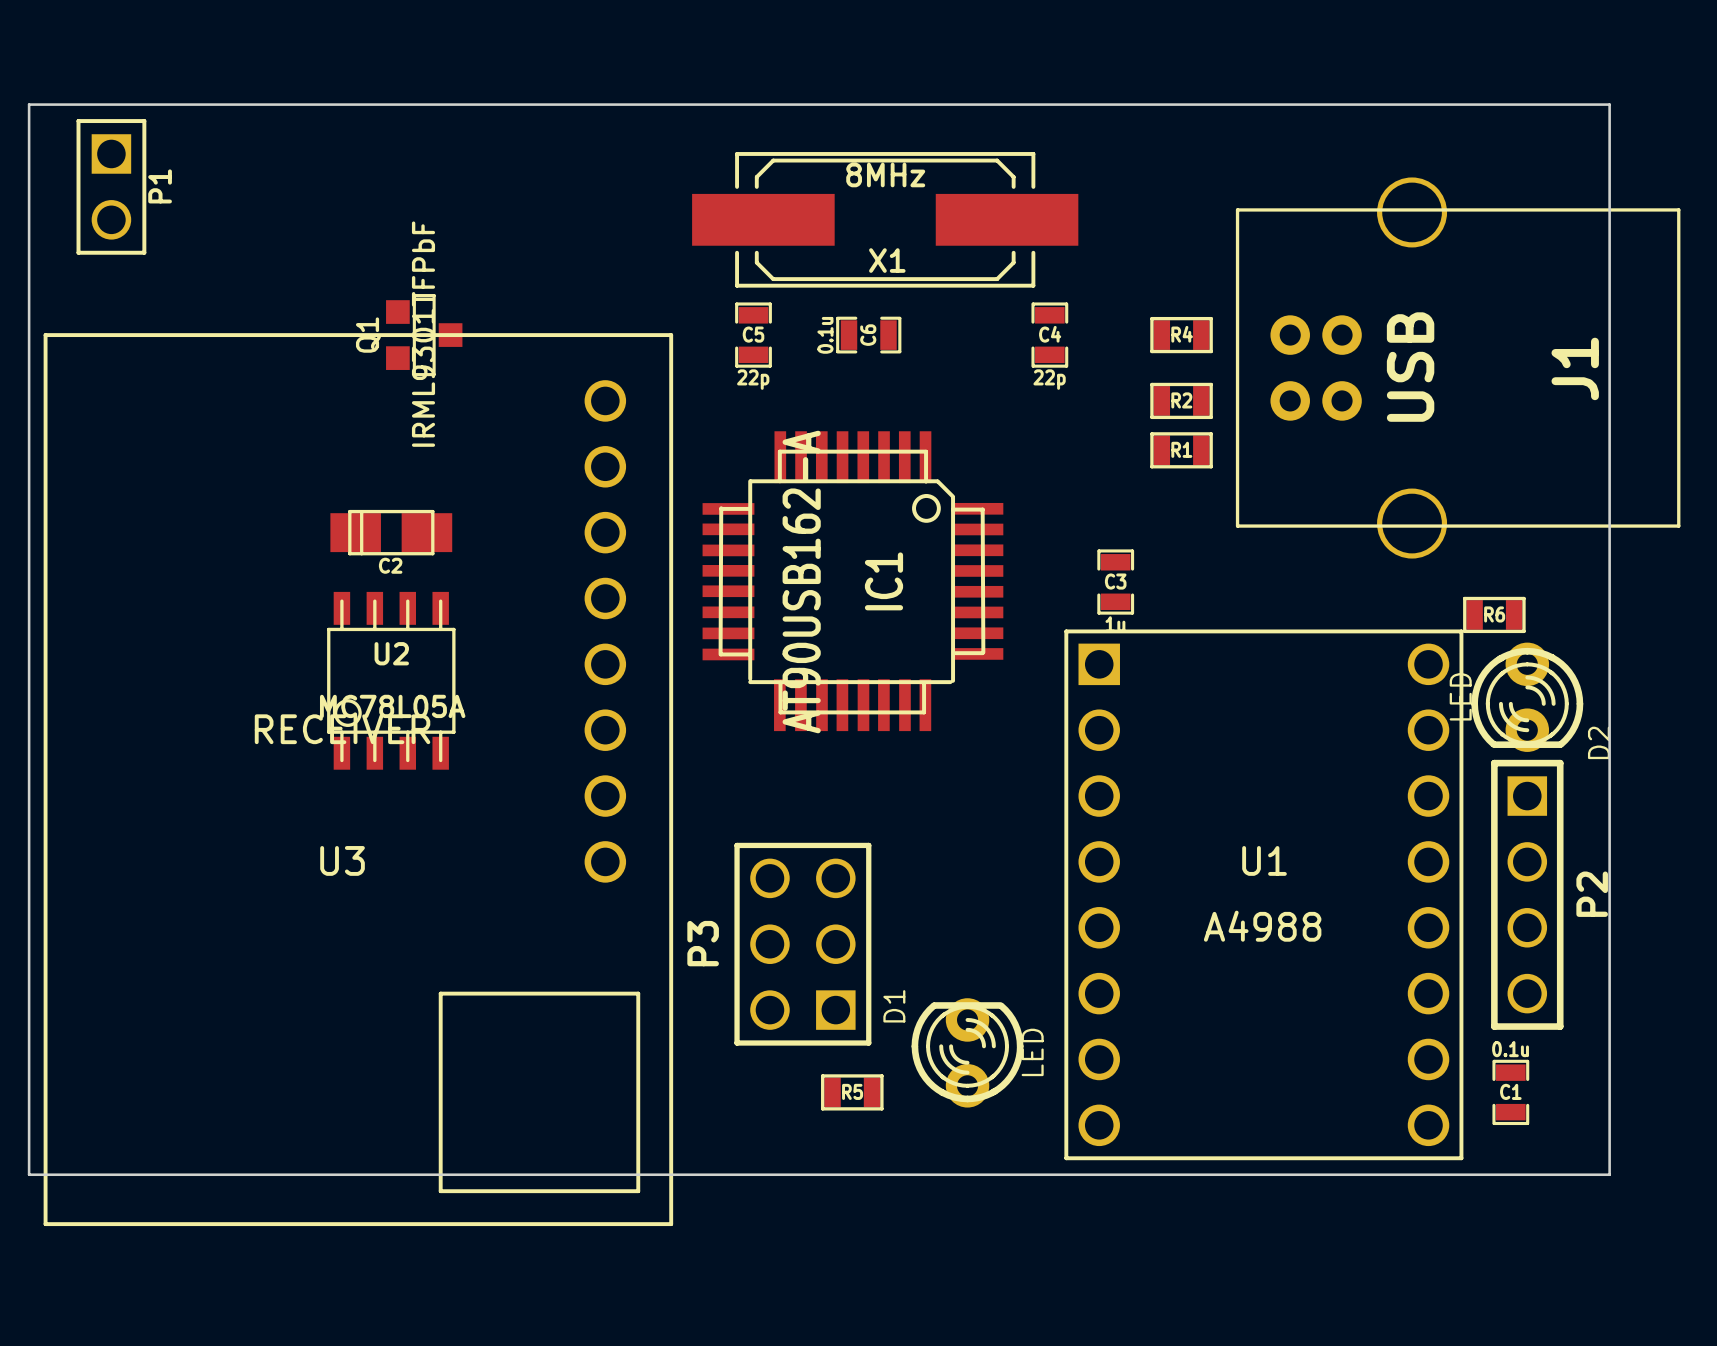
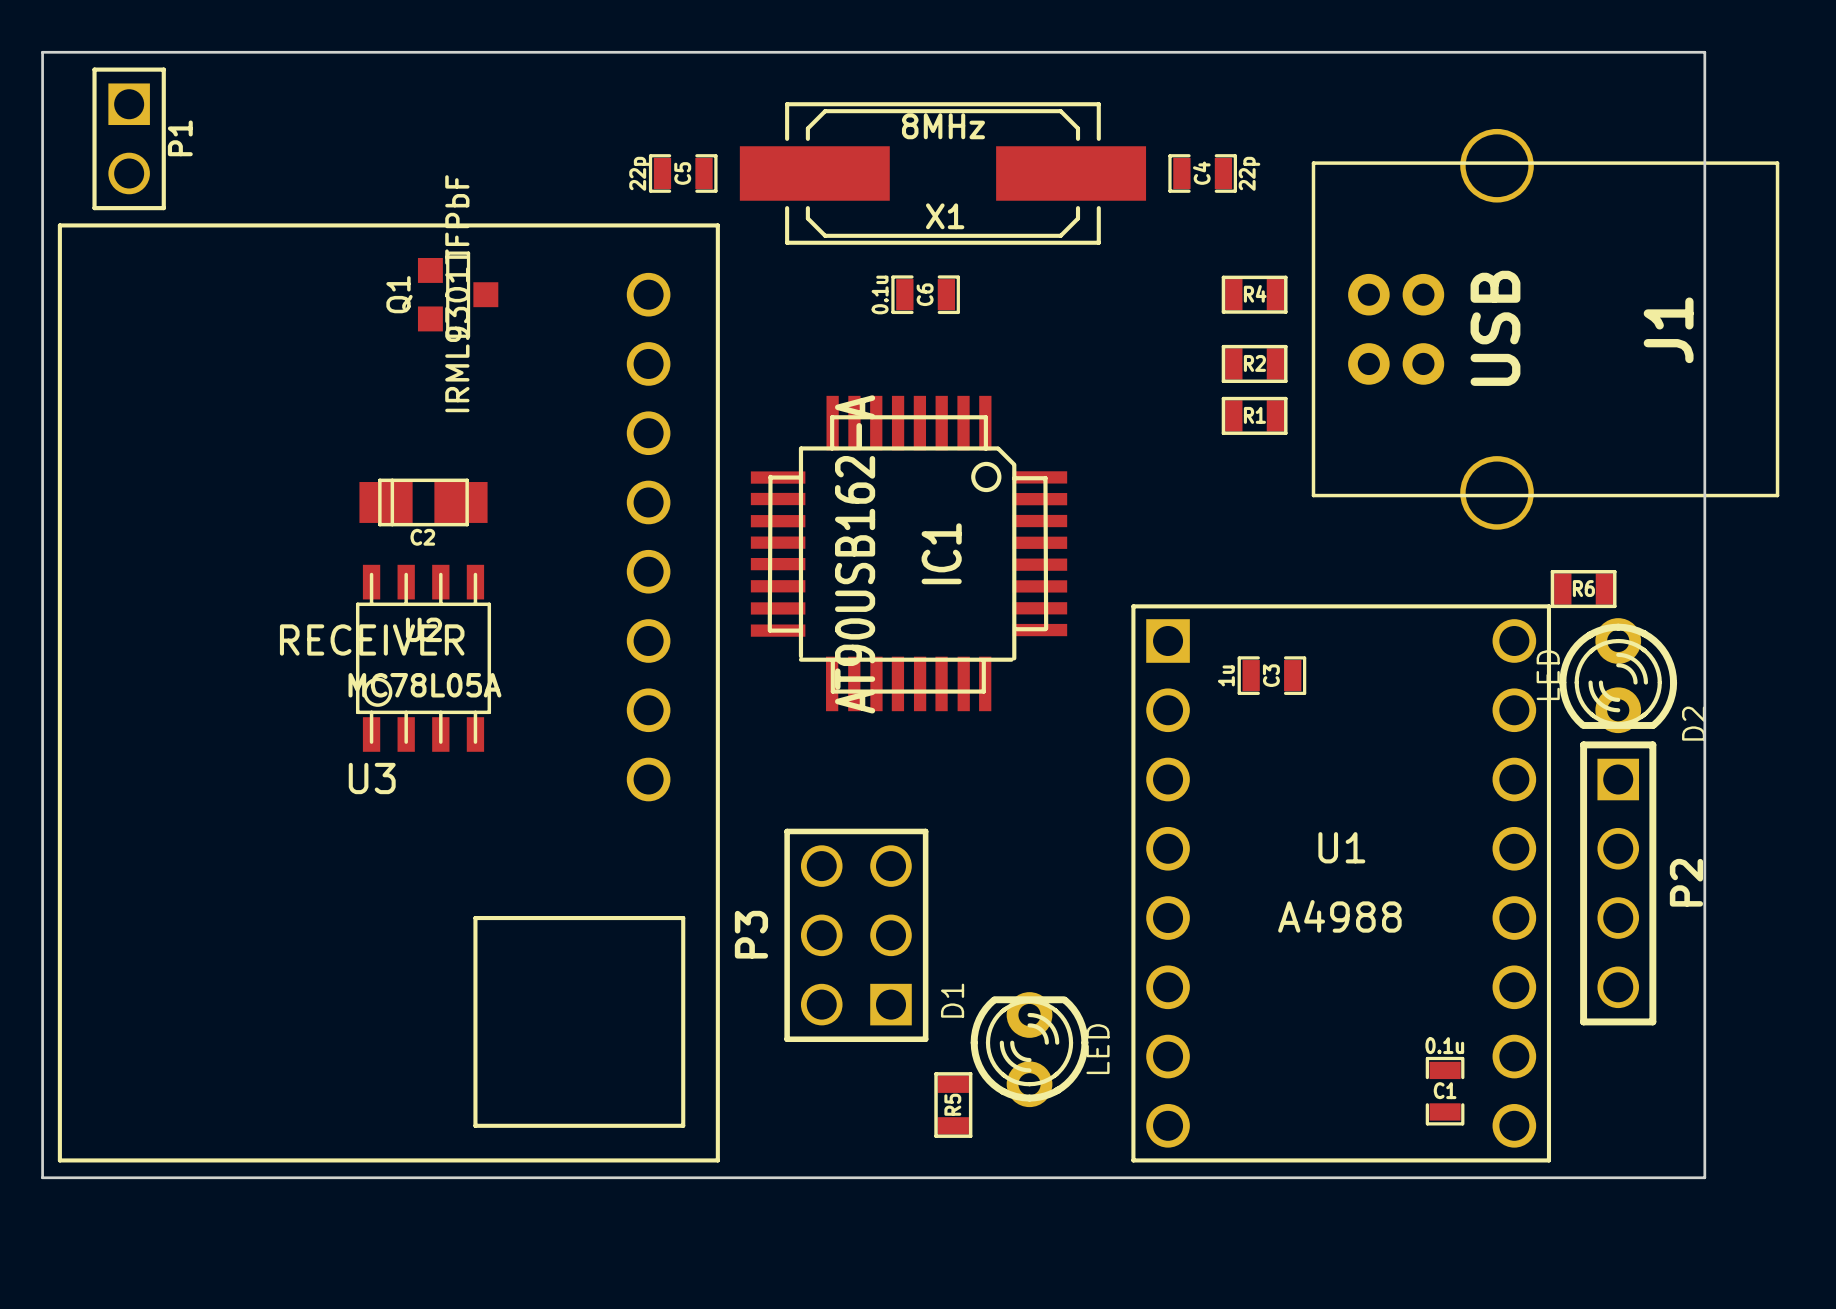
C5 rotation: 0° (753, 335) -> 90° clockwise (683, 173)
C5 position: (753, 335) -> (683, 173)
C4 rotation: 0° (1049, 335) -> 90° clockwise (1202, 173)
C4 position: (1049, 335) -> (1202, 173)
C4 value position: 22p (1049, 379) -> 22p (1249, 173)
C3 rotation: 0° (1115, 582) -> 90° clockwise (1271, 675)
C3 position: (1115, 582) -> (1271, 675)
U3 position: (358, 779) -> (388, 692)
R5 rotation: 0° (852, 1092) -> 90° clockwise (953, 1105)
R5 position: (852, 1092) -> (953, 1105)
C1 position: (1510, 1092) -> (1445, 1091)

